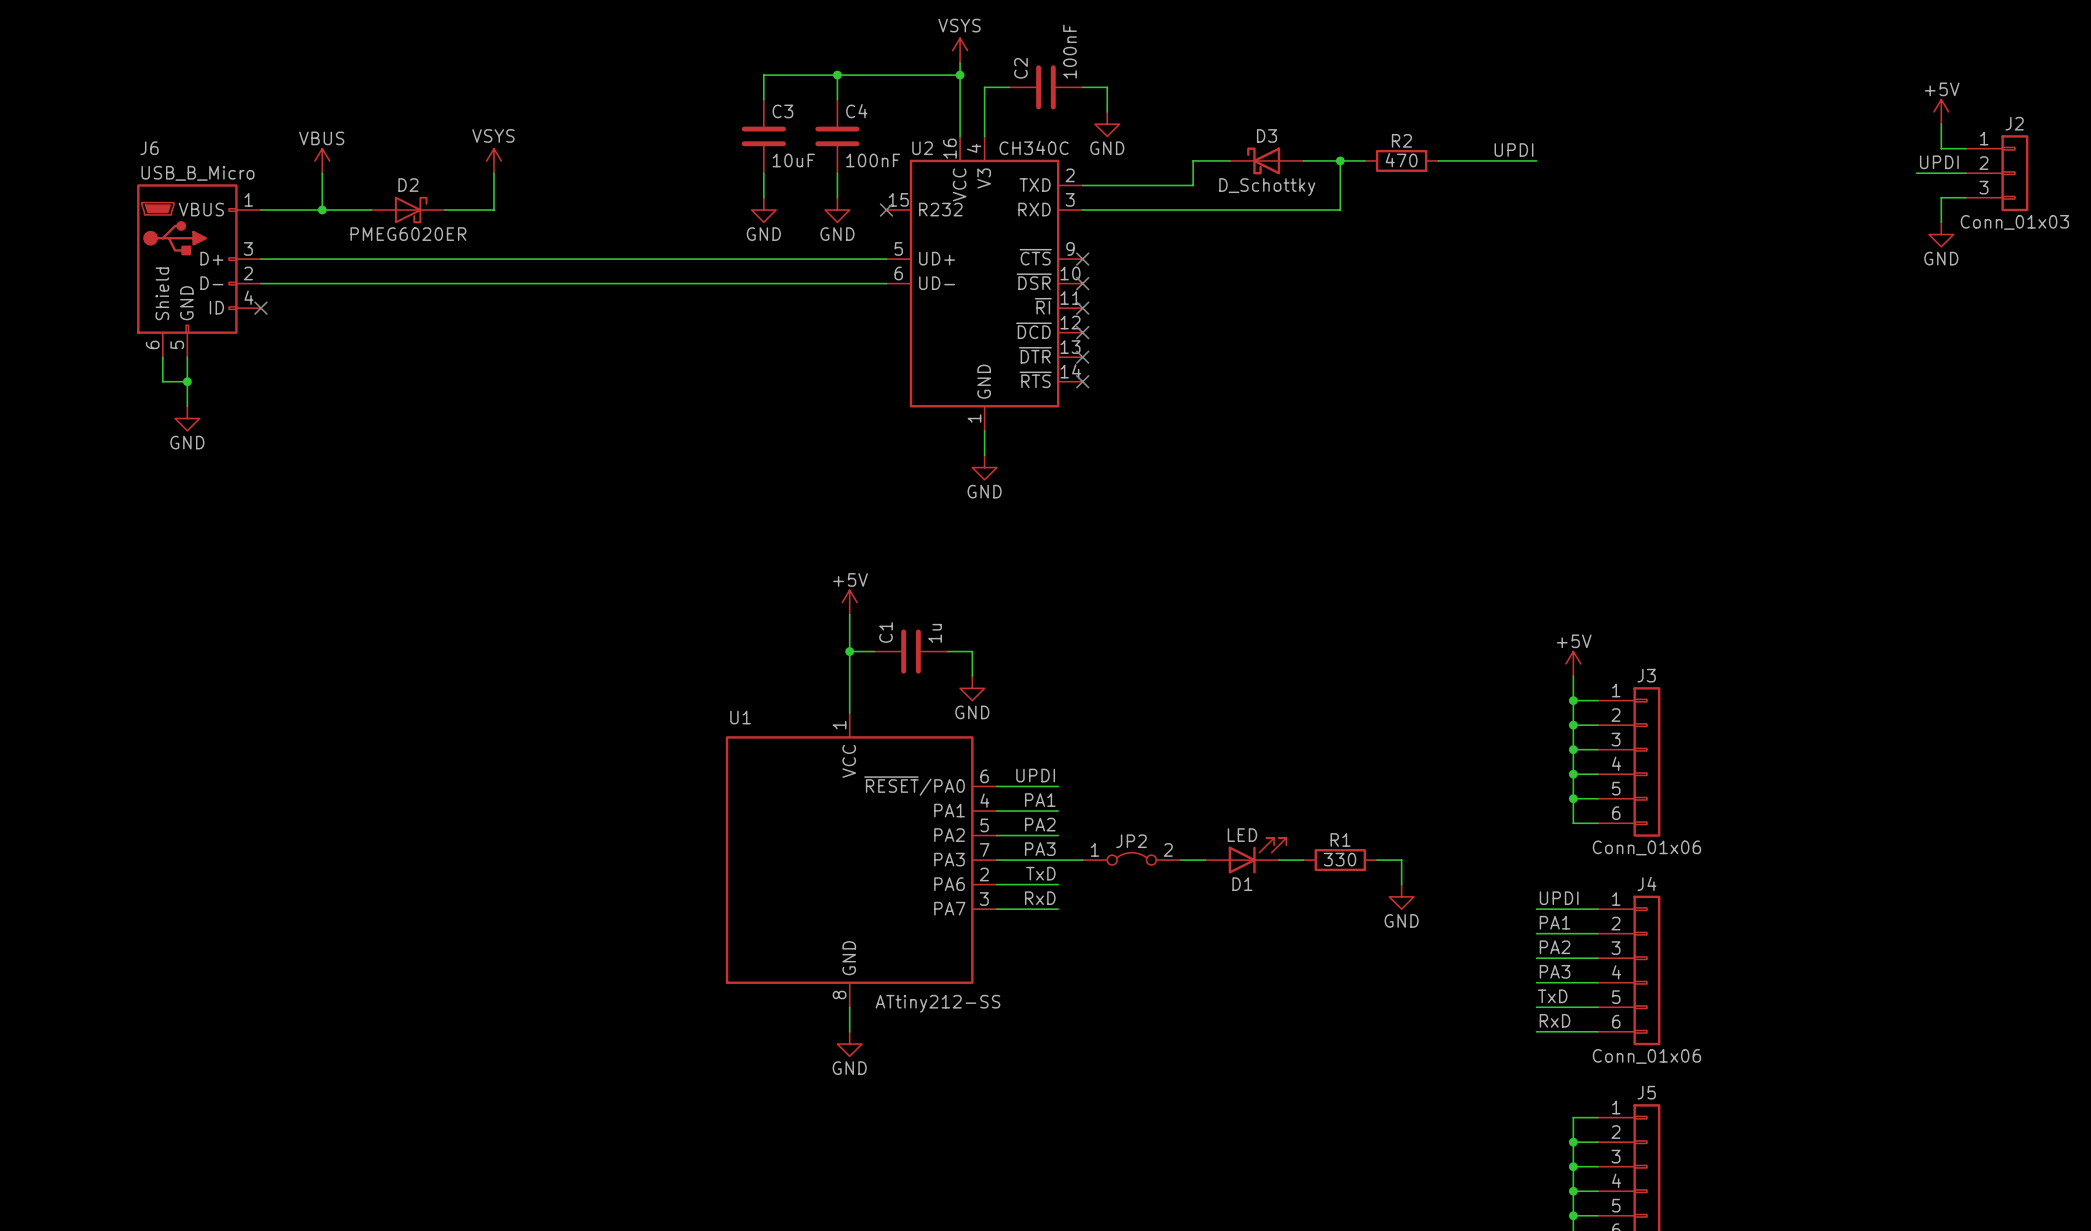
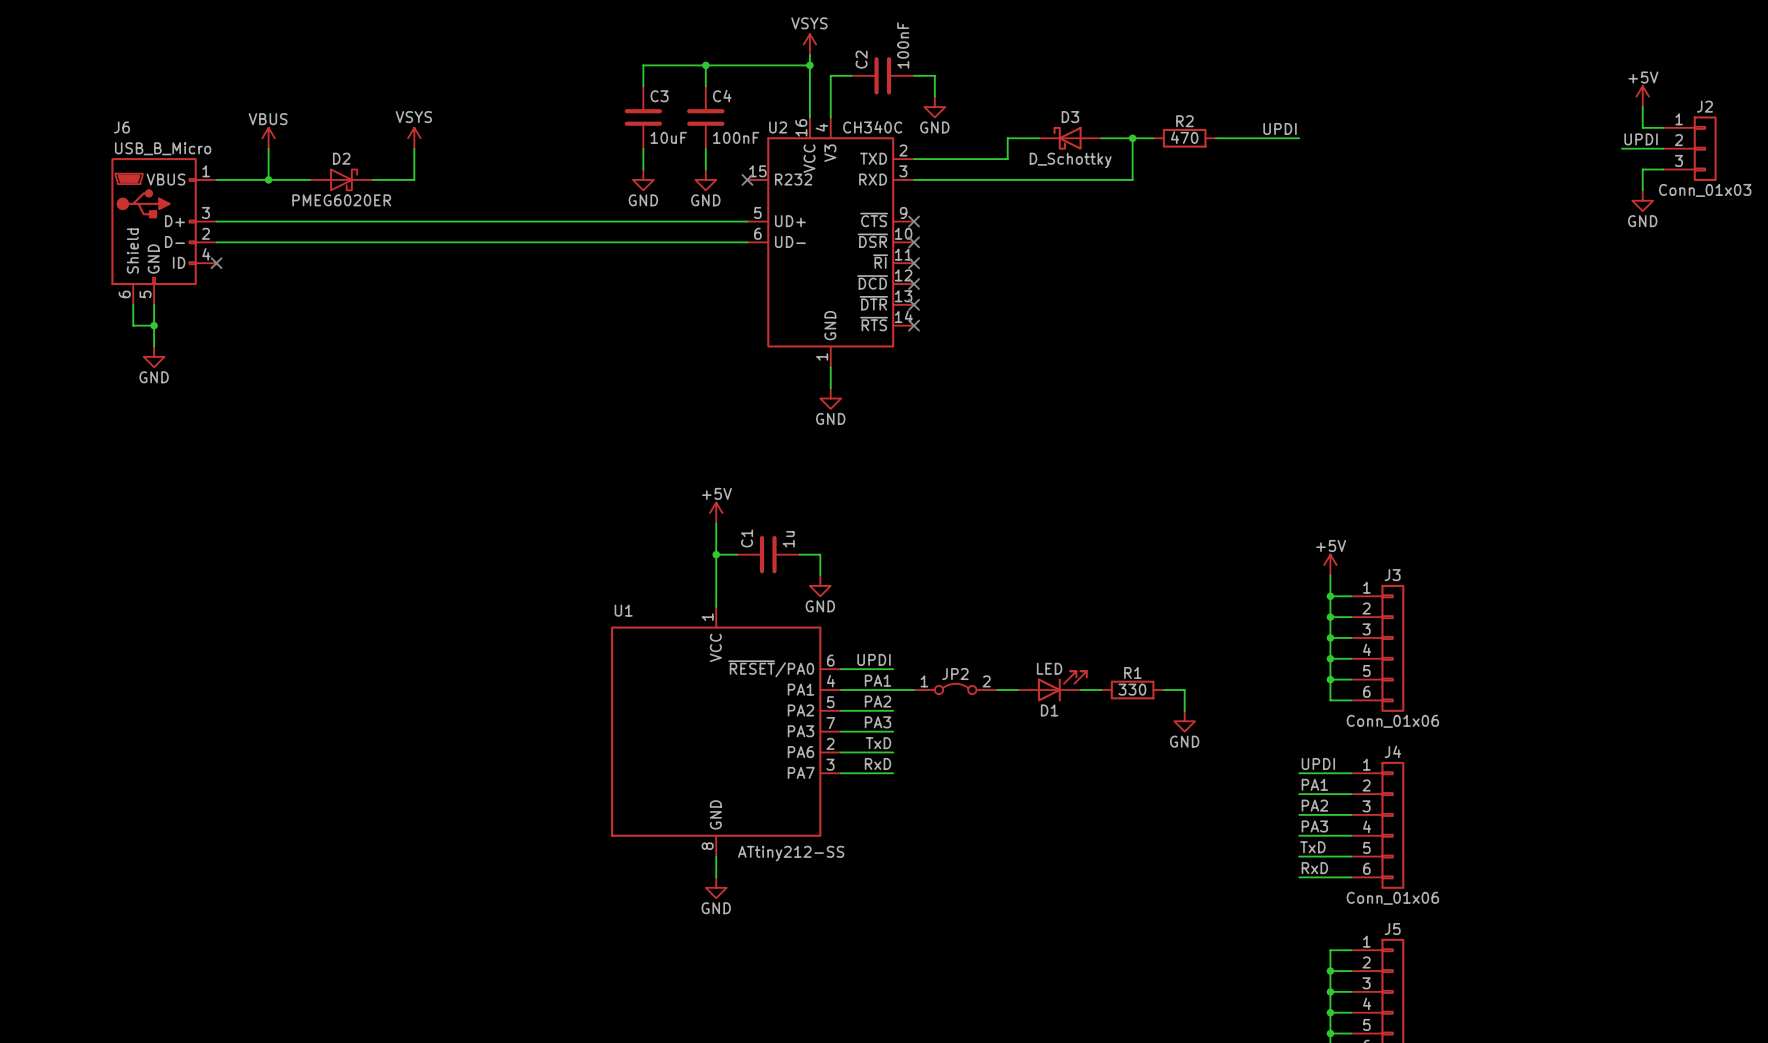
D1 position: (1245, 855) -> (1052, 686)
JP2 position: (1131, 858) -> (955, 688)
wire: (1058, 860) (1082, 860) -> (893, 690) (914, 690)
wire: (1180, 860) (1205, 860) -> (997, 690) (1018, 690)
wire: (1278, 860) (1303, 860) -> (1080, 690) (1101, 690)
R1 position: (1340, 860) -> (1132, 690)
wire: (1377, 860) (1401, 860) (1401, 884) -> (1163, 690) (1184, 690) (1184, 710)
power symbol position: GND (1401, 896) -> GND (1184, 721)

